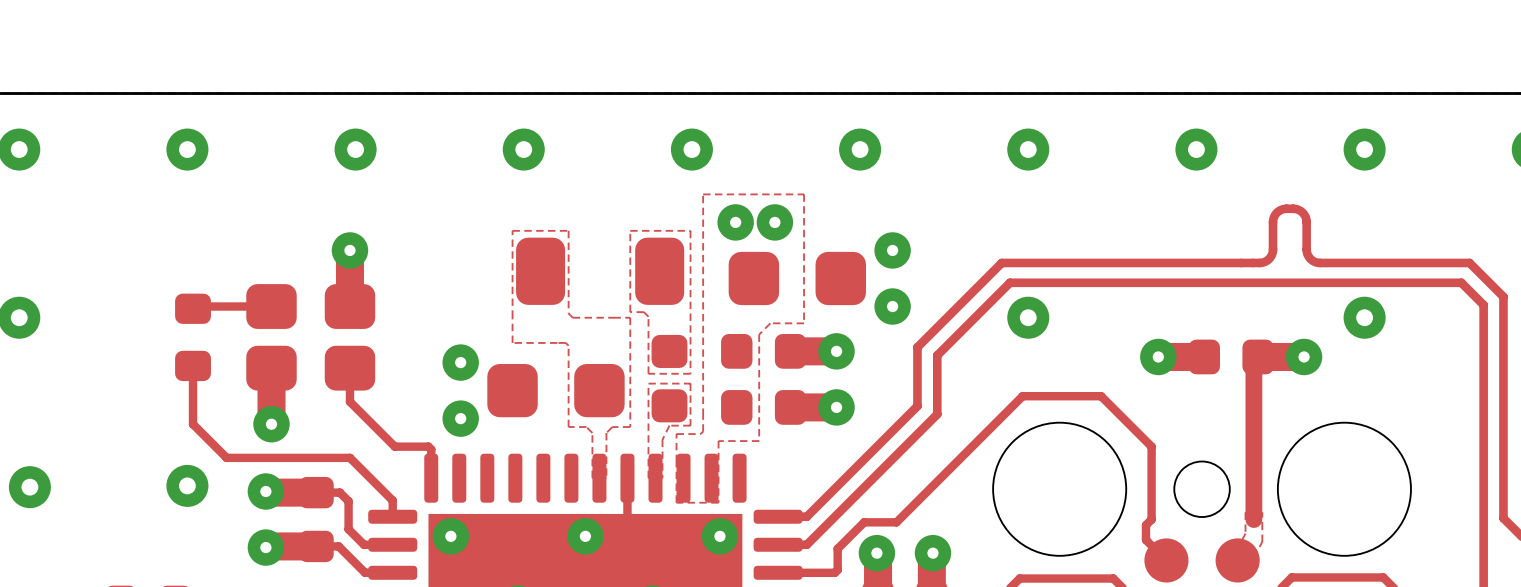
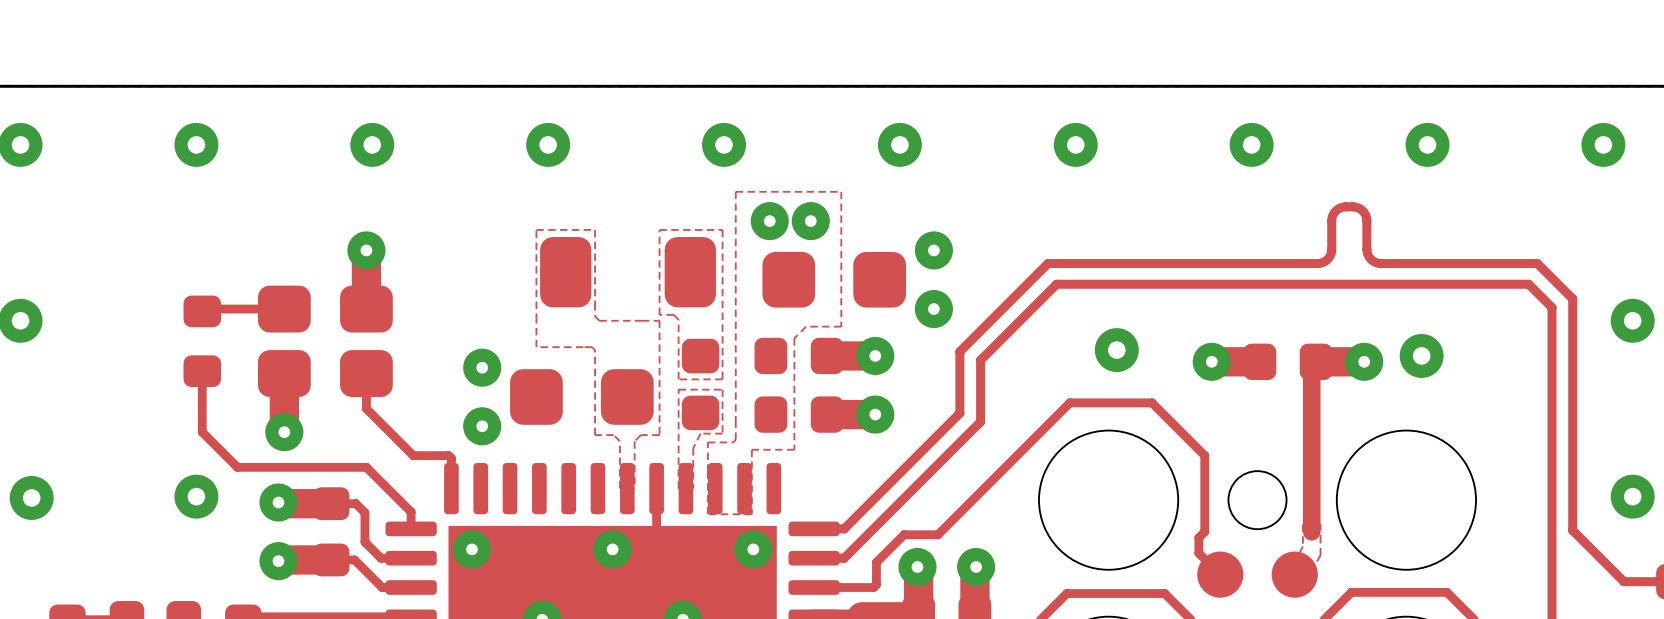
via position: (1028, 317) -> (1116, 350)
via position: (1364, 317) -> (1421, 355)

